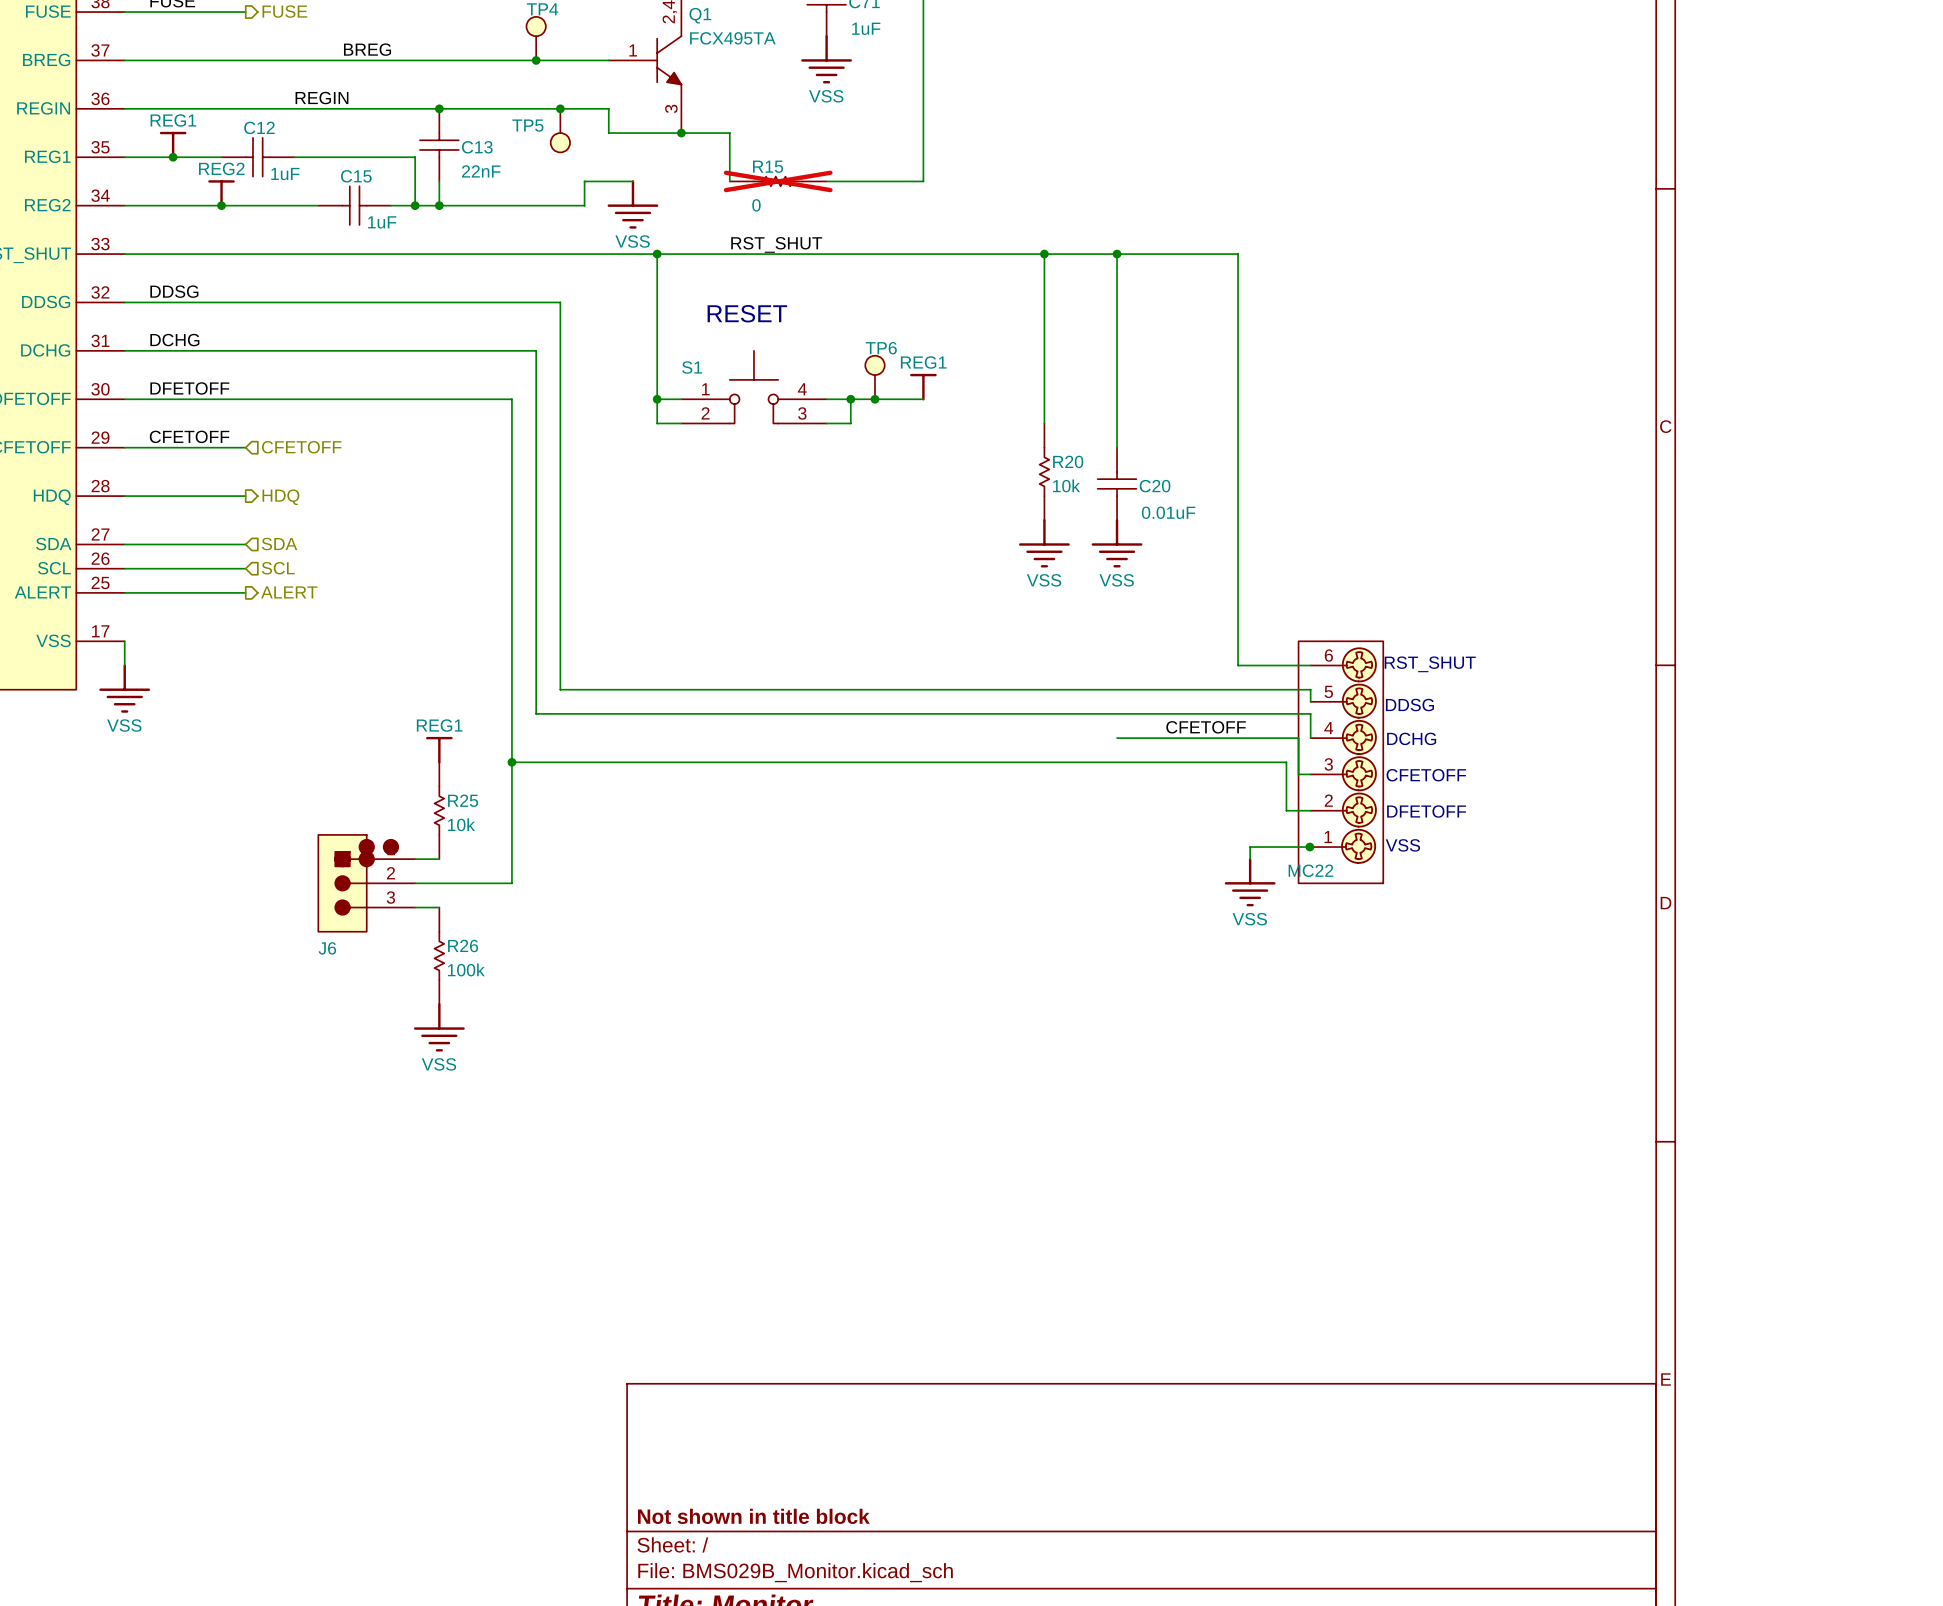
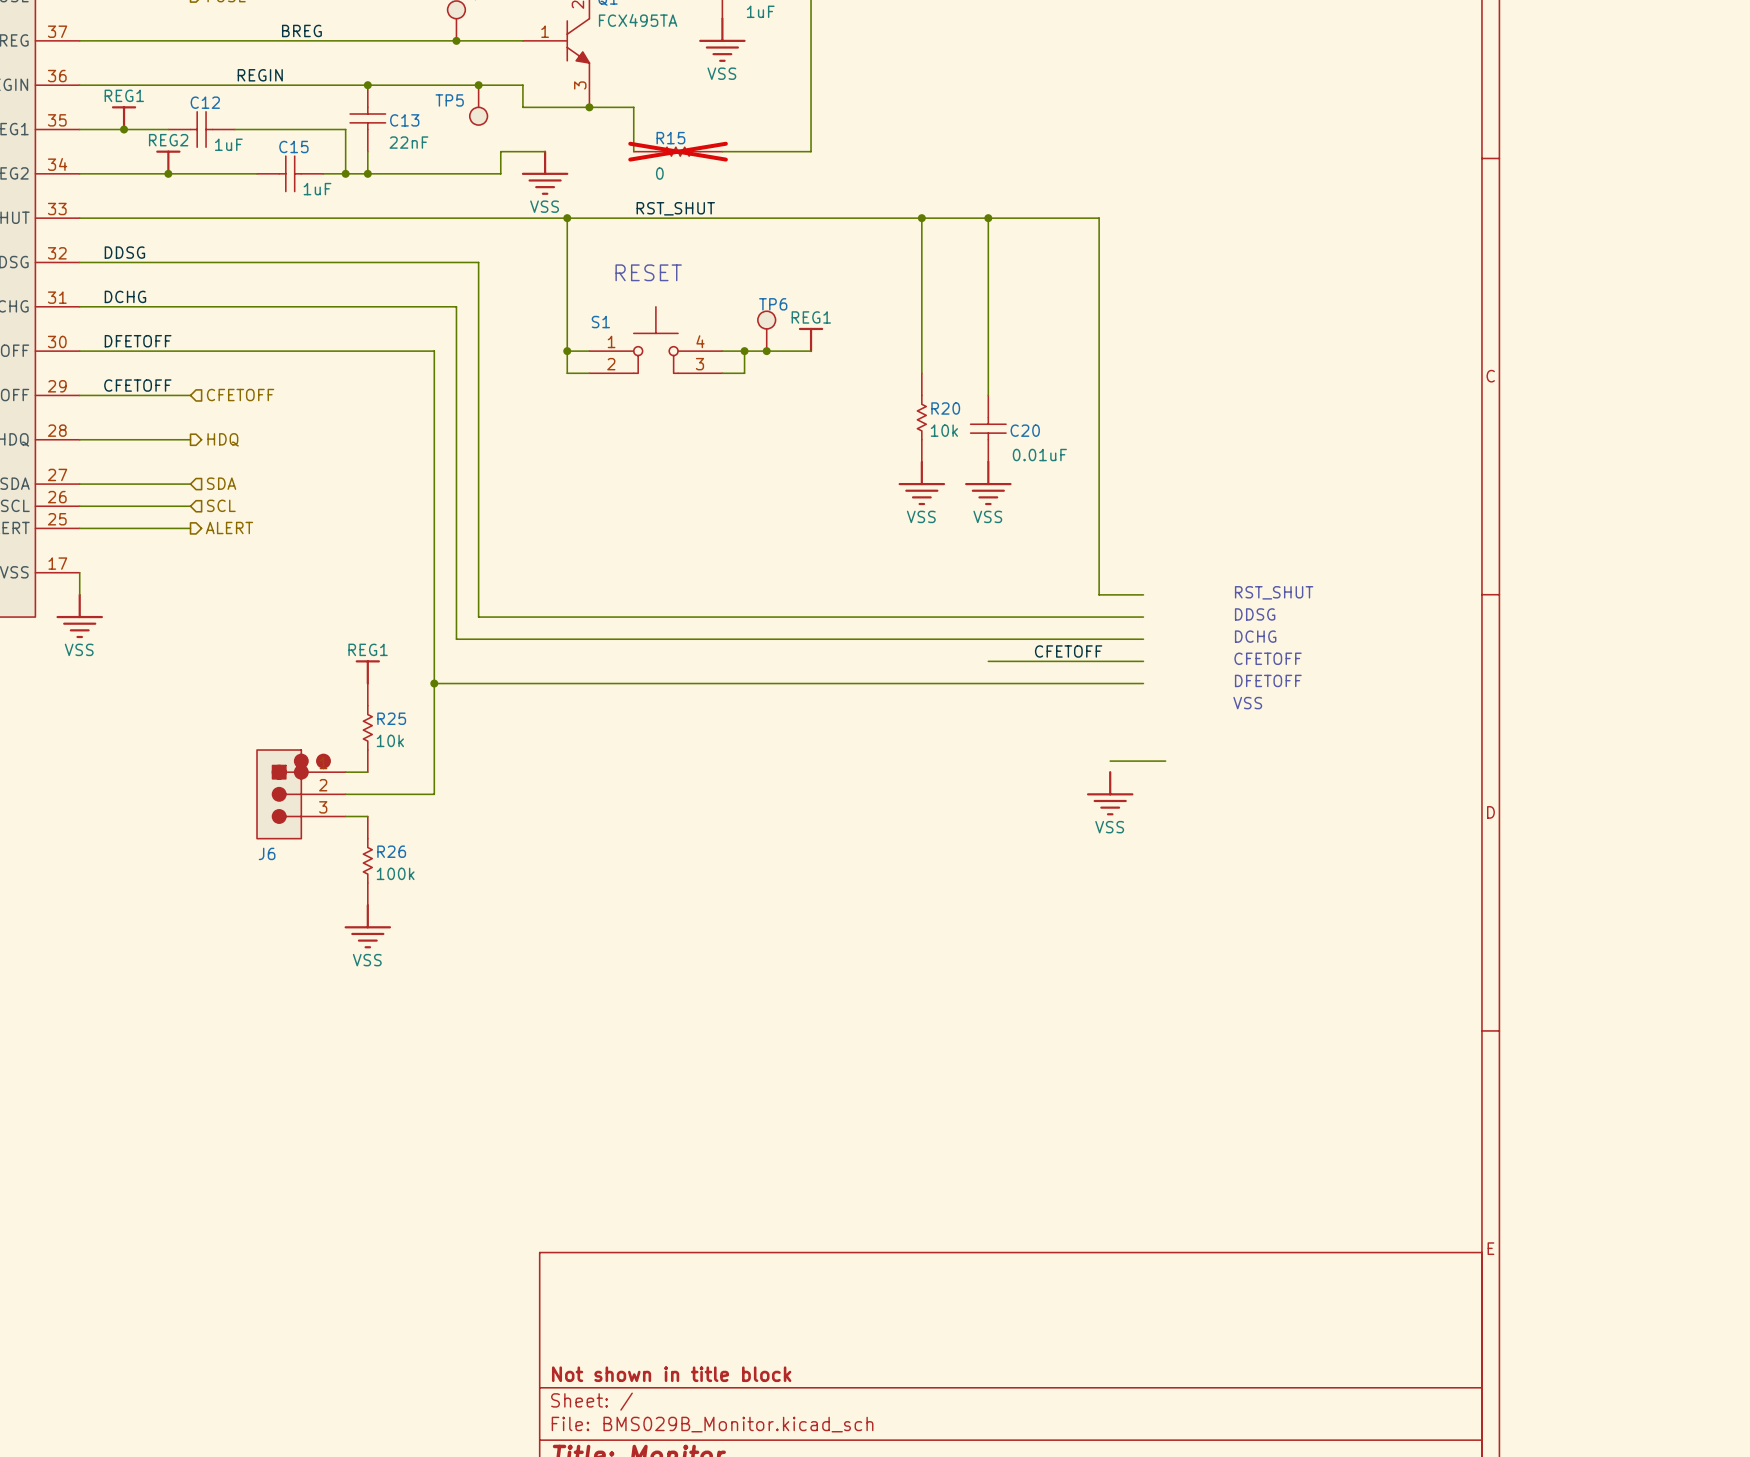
wire: (1286, 665) (1310, 665) -> none
wire: (1286, 689) (1310, 689) (1310, 701) -> none
text position: DDSG (1409, 705) -> DDSG (1255, 614)
wire: (1286, 713) (1310, 713) (1310, 738) -> none
wire: (1286, 738) (1298, 738) (1298, 774) (1310, 774) -> none
text position: DCHG (1411, 738) -> DCHG (1255, 636)
wire: (1286, 762) (1286, 810) (1310, 810) -> none
MC22: (1340, 762) -> none
text position: CFETOFF (1426, 775) -> CFETOFF (1268, 658)
text position: DFETOFF (1426, 811) -> DFETOFF (1268, 680)
text position: VSS (1402, 845) -> VSS (1247, 703)
wire: (1250, 847) (1250, 859) -> none
junction: (1309, 847) -> none

